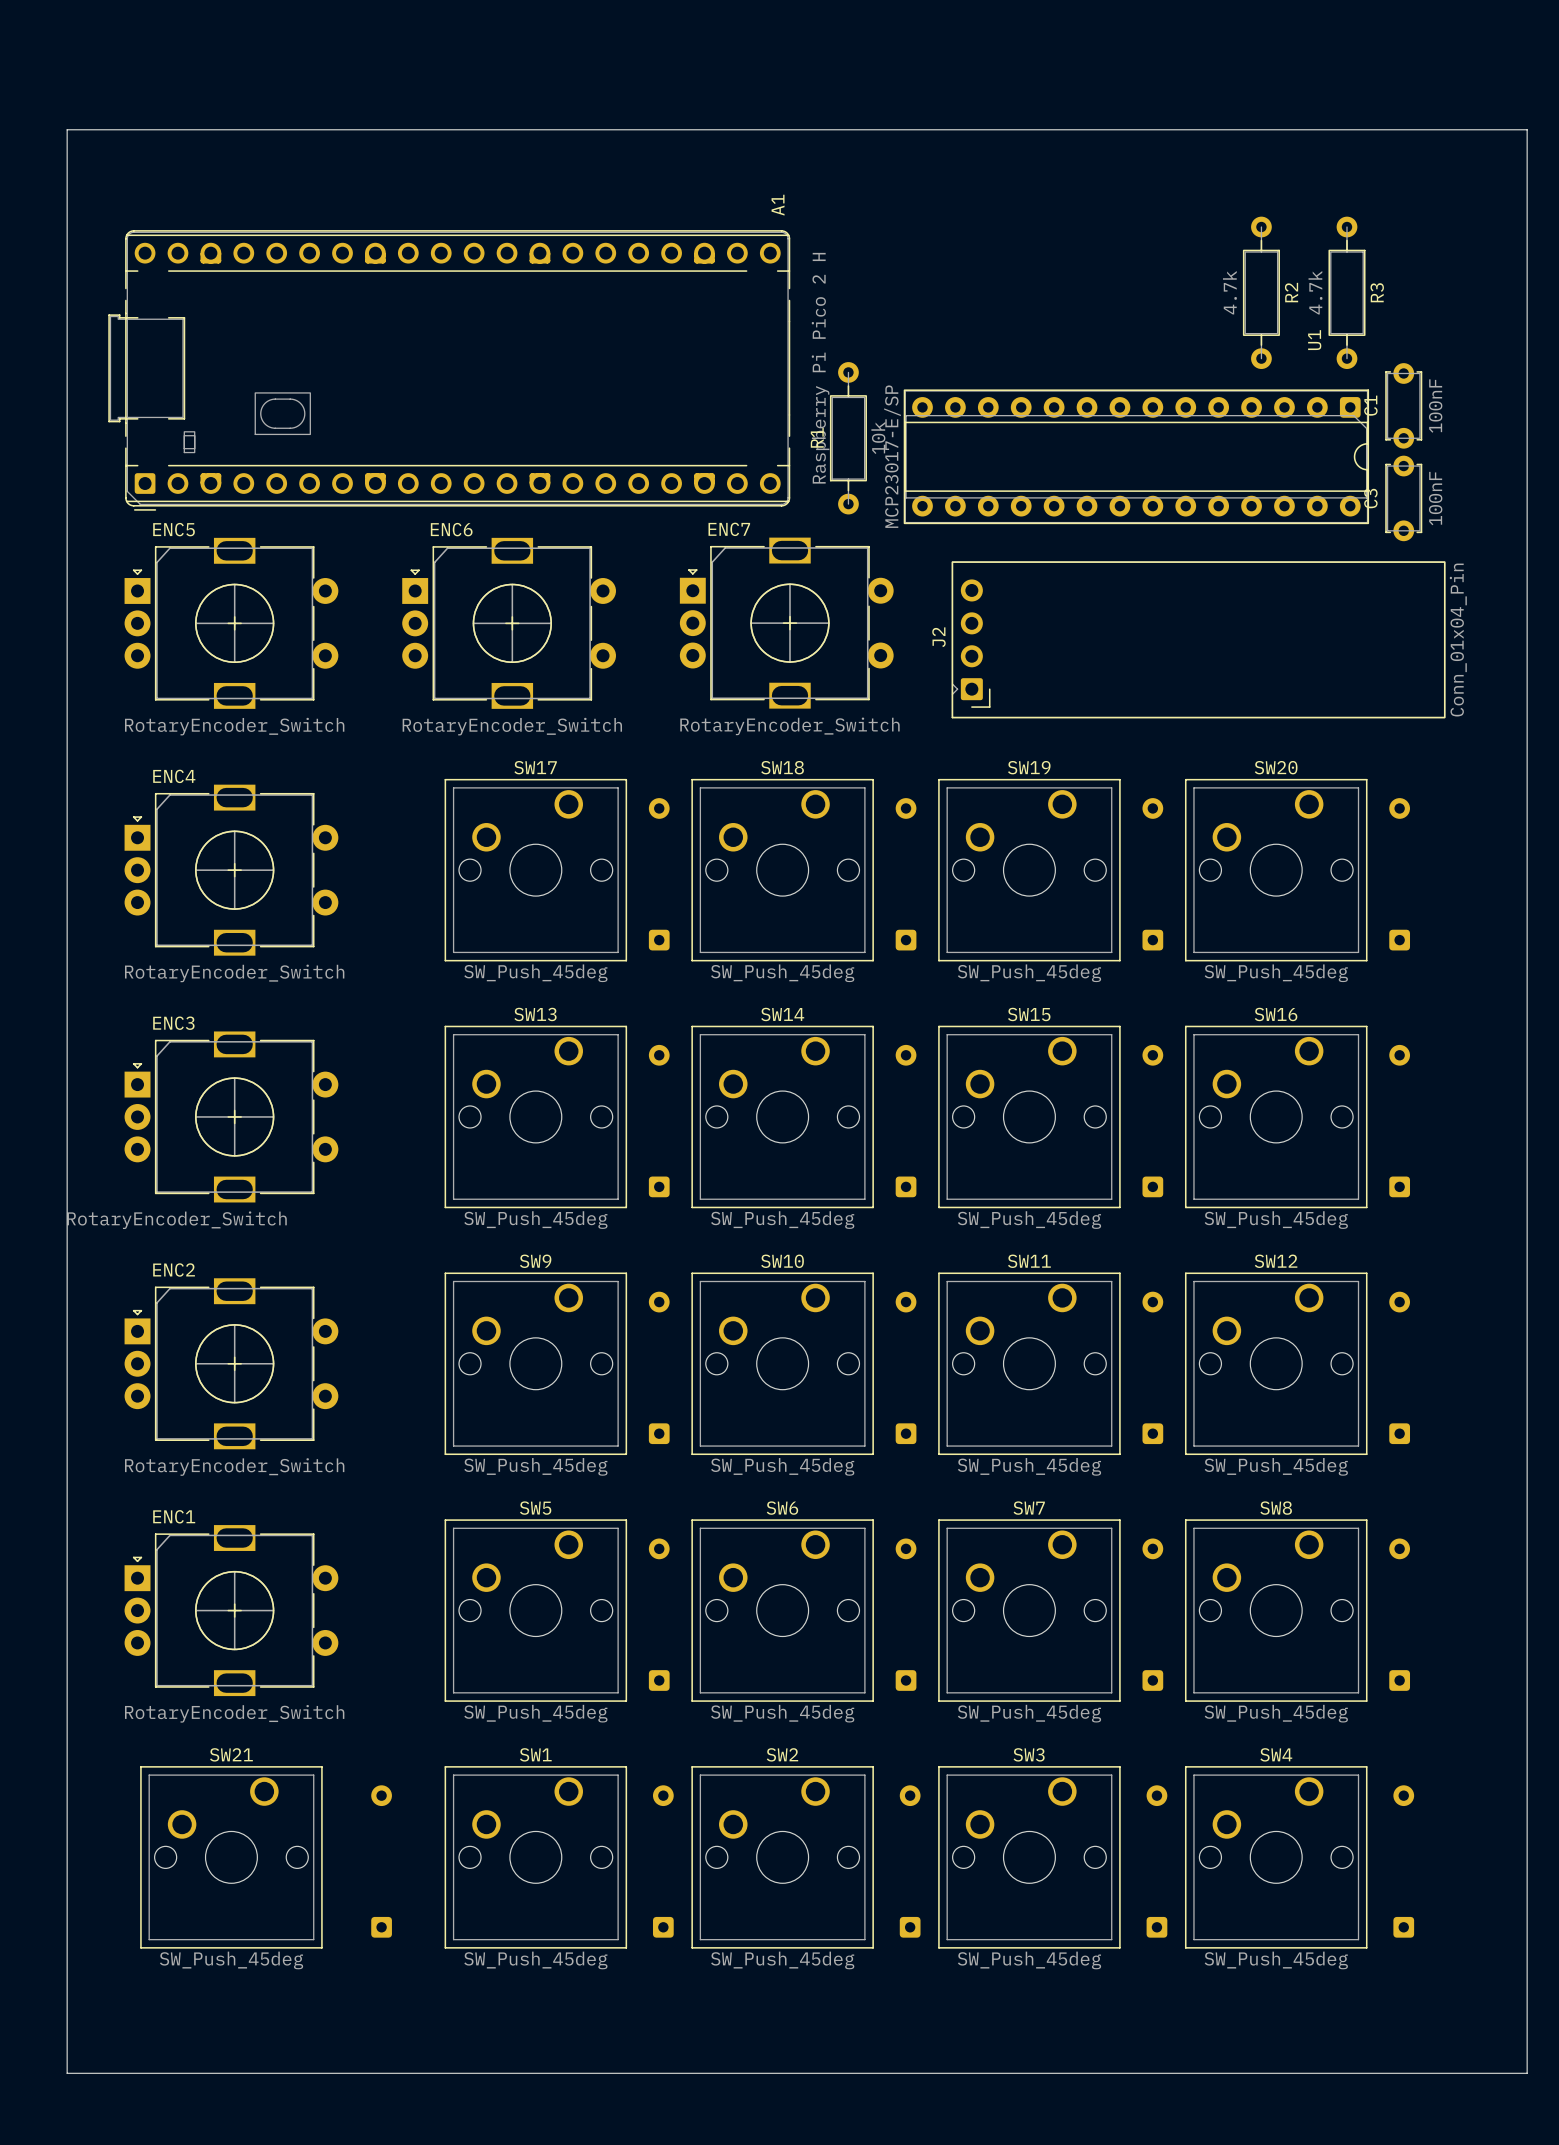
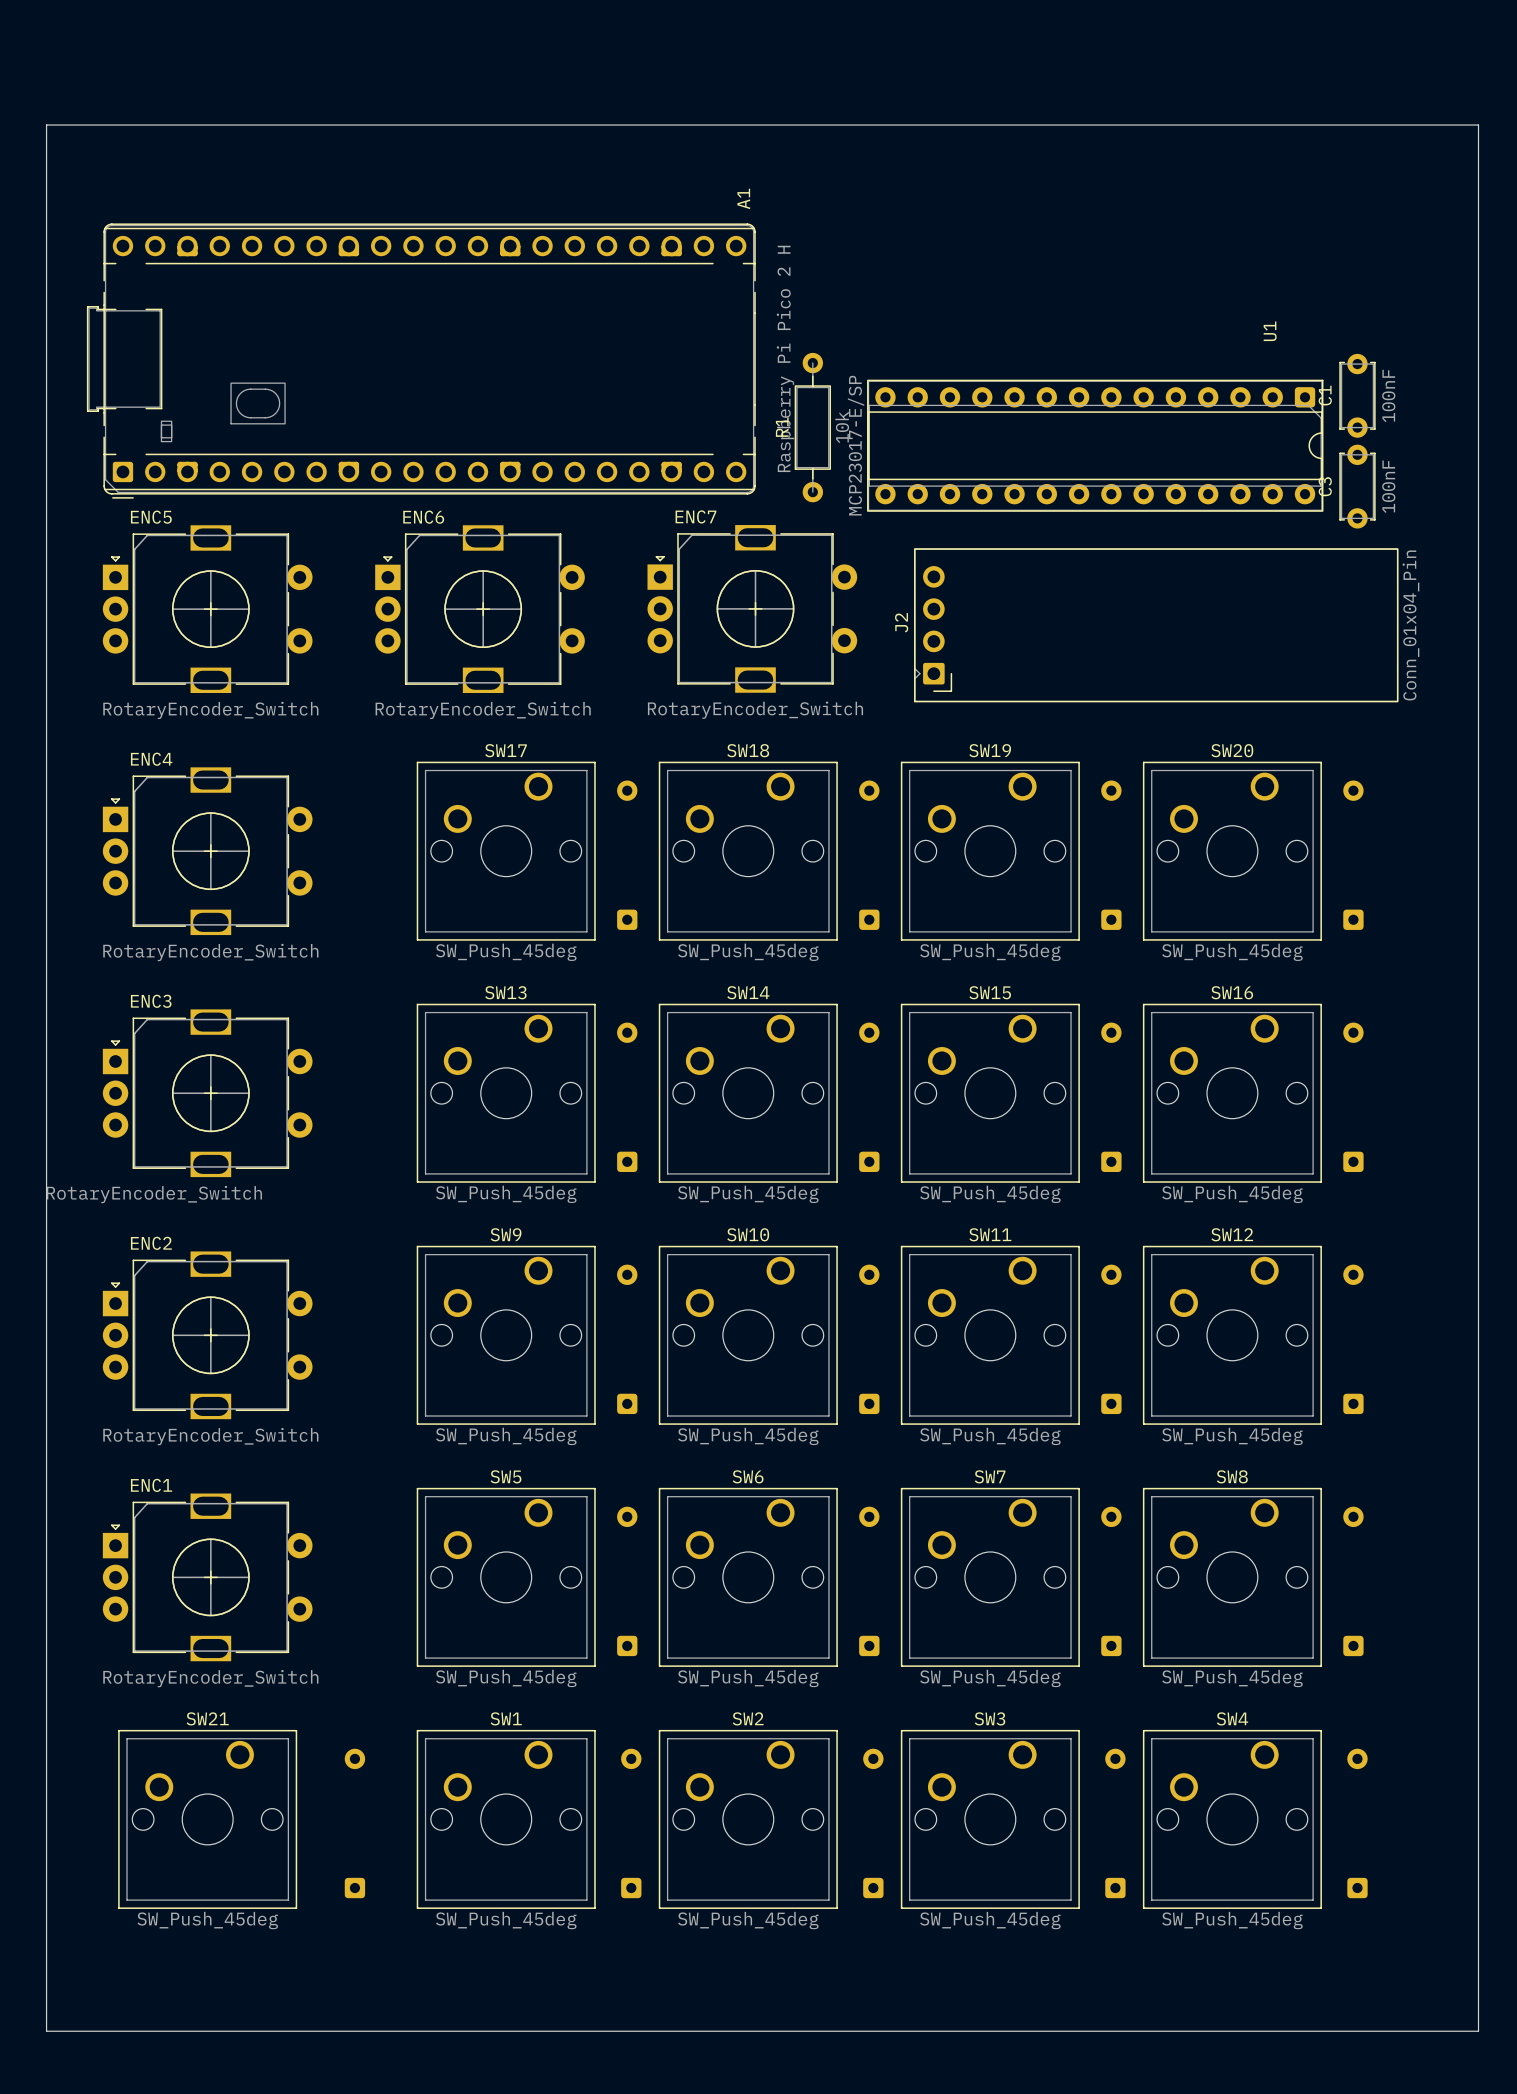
R2: 4.7k (1261, 292) -> none
R3: 4.7k (1346, 292) -> none

